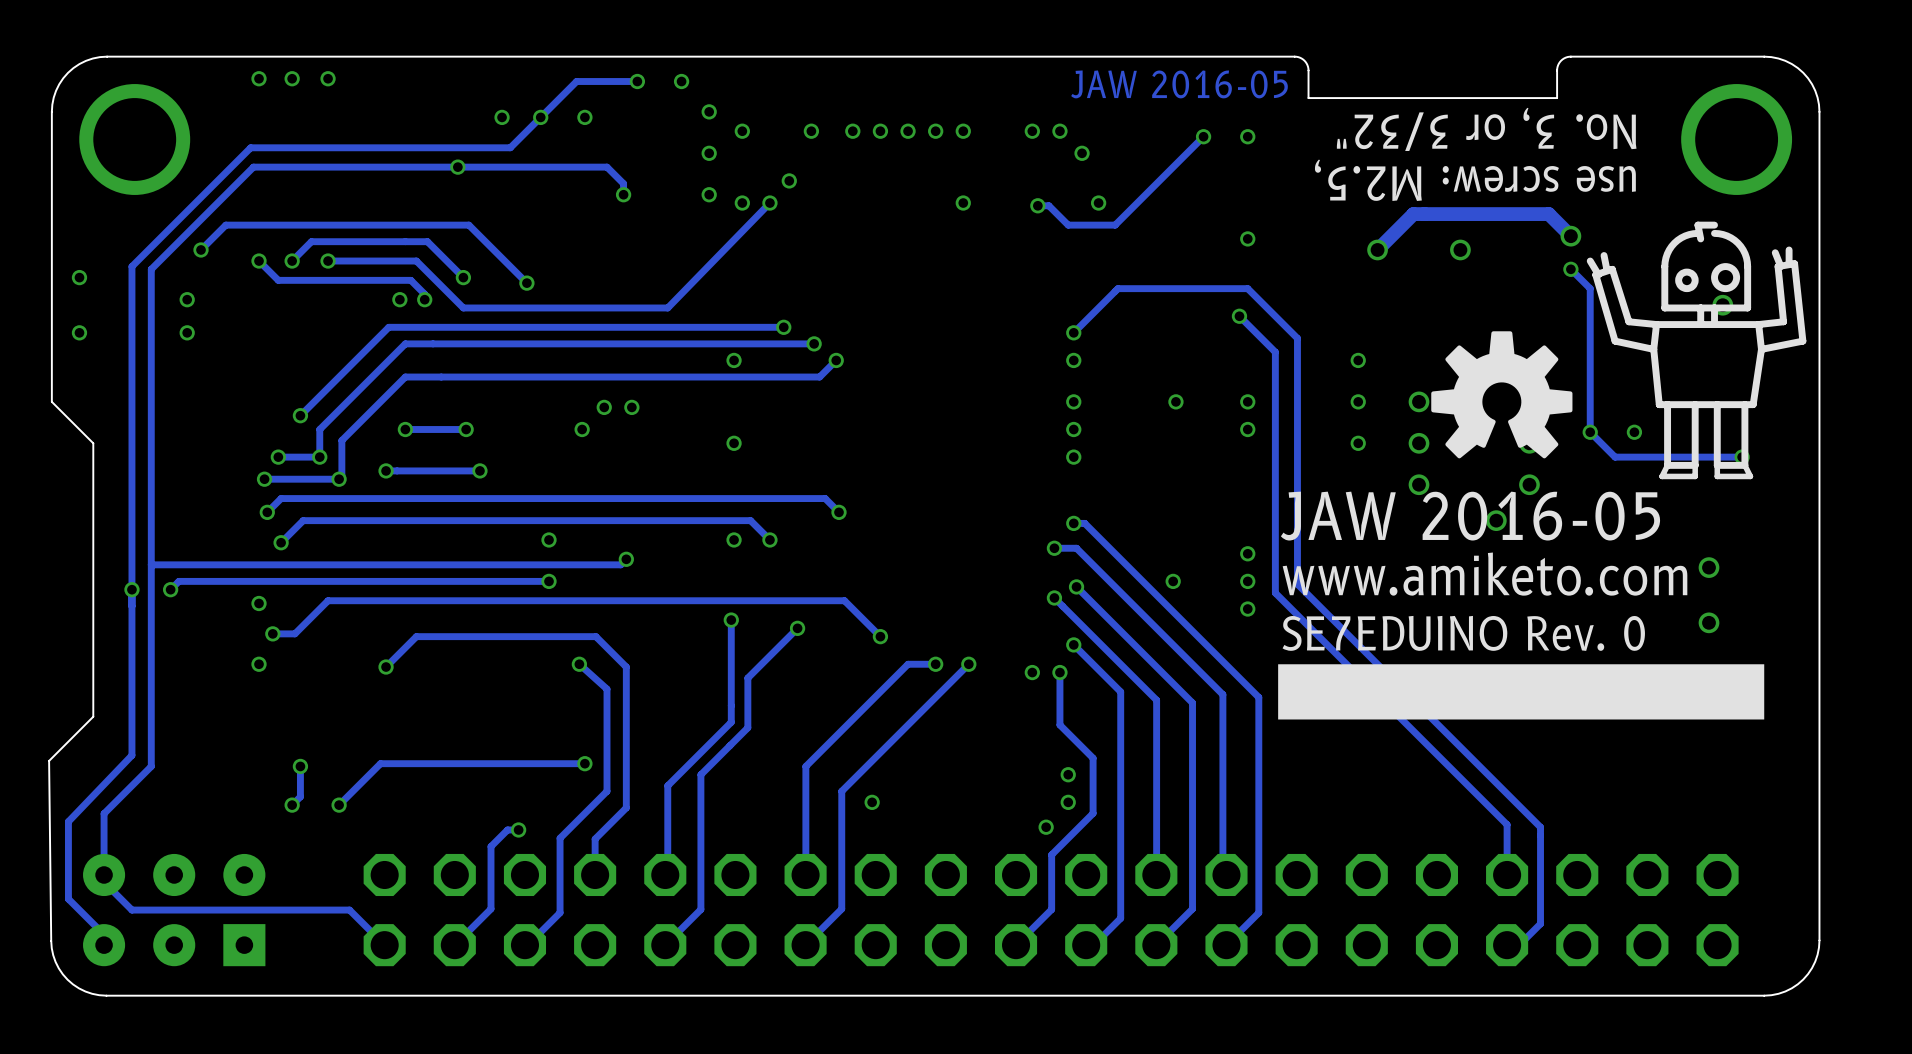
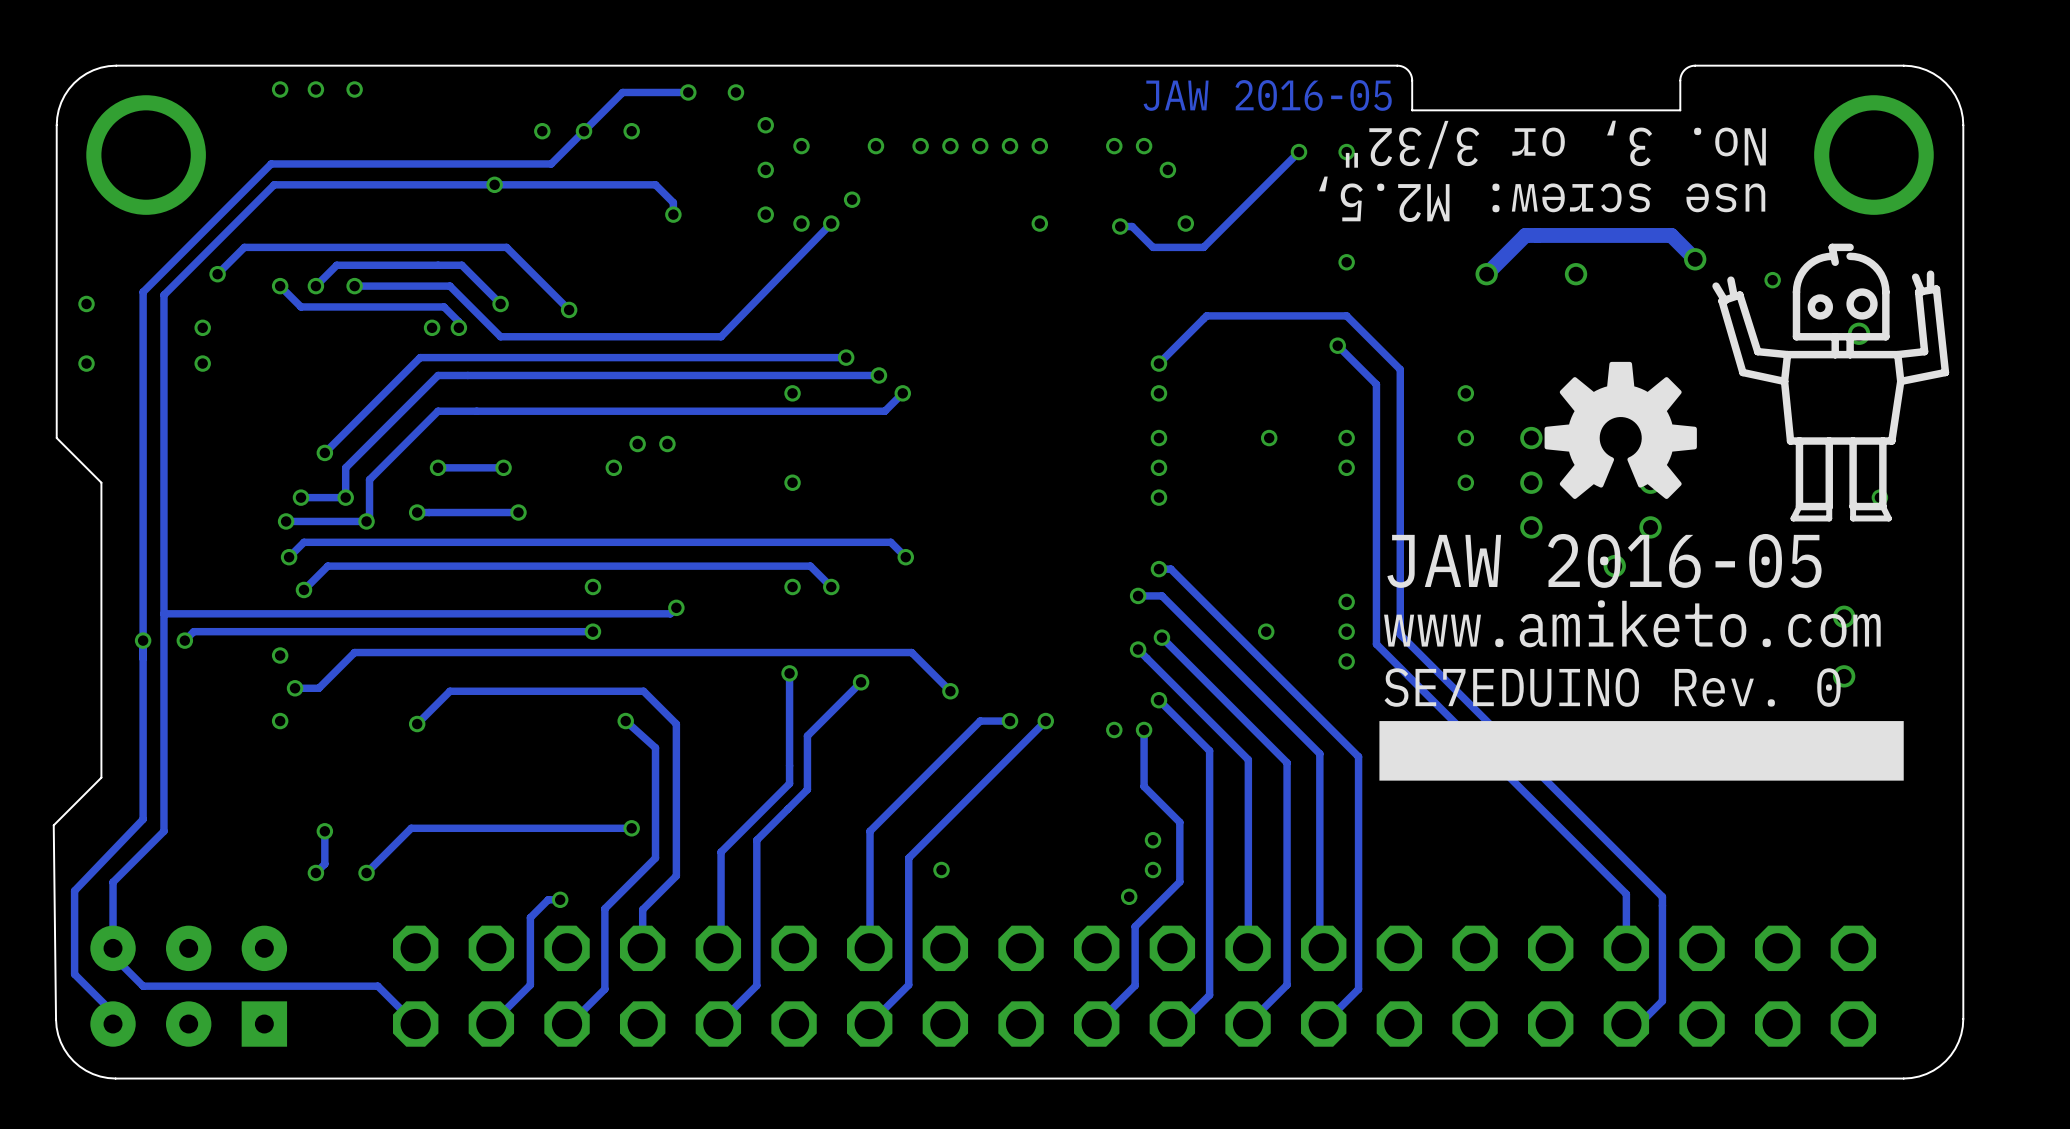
track: (1570, 269) (1590, 288) (1590, 432) (1615, 457) (1742, 457) -> none
via position: (1570, 269) -> (1772, 280)
via: none -> (637, 444)
via: (604, 407) -> none
via: none -> (667, 444)
via: (631, 407) -> none
via position: (582, 429) -> (613, 467)
via: (1590, 432) -> none
via: (1634, 432) -> none

